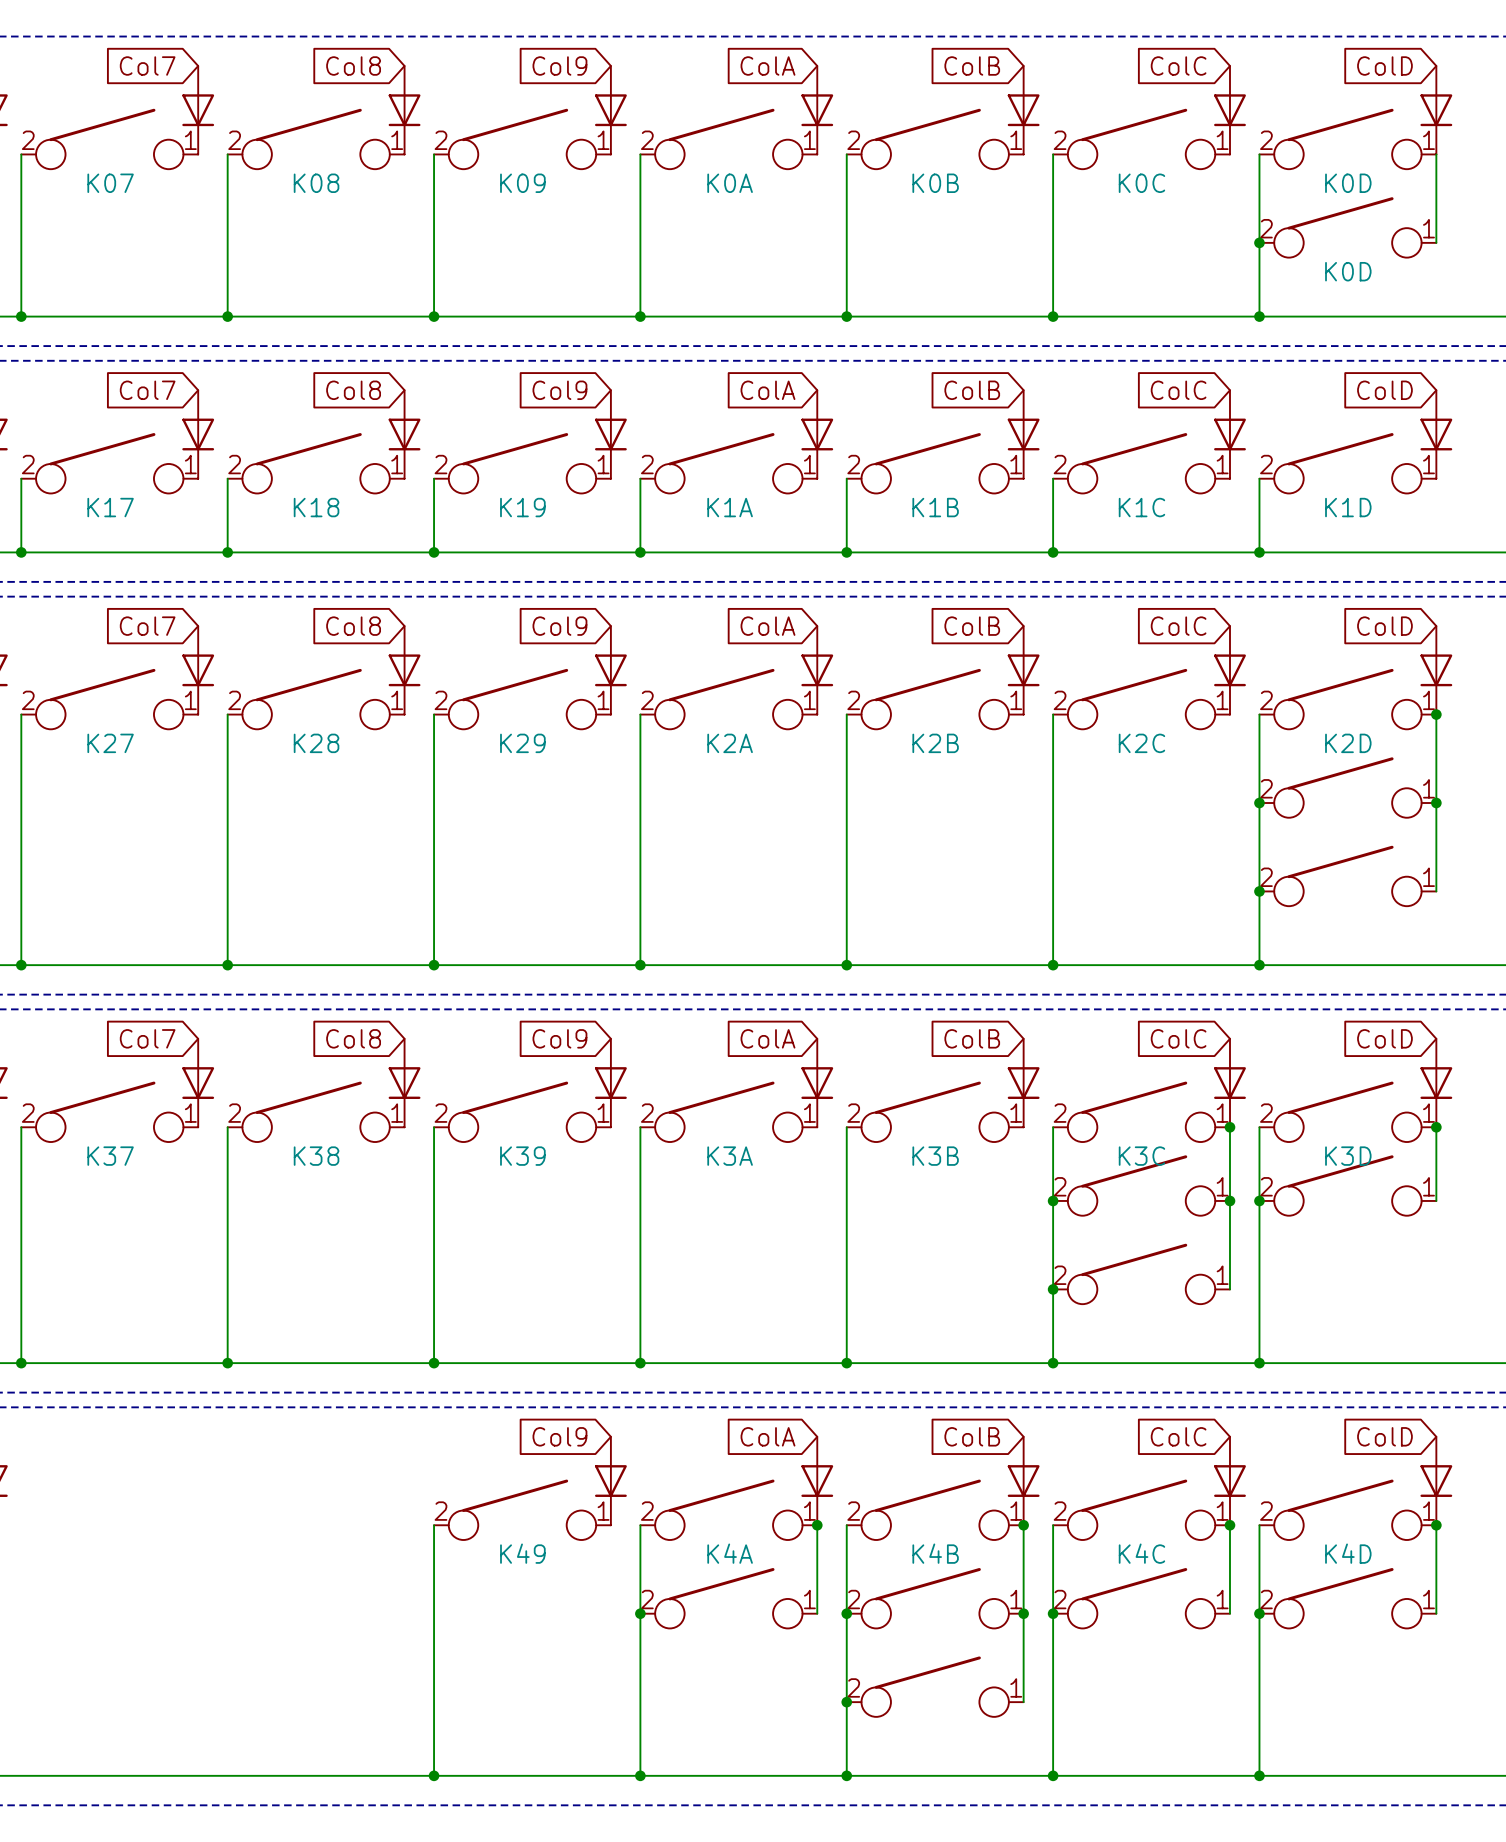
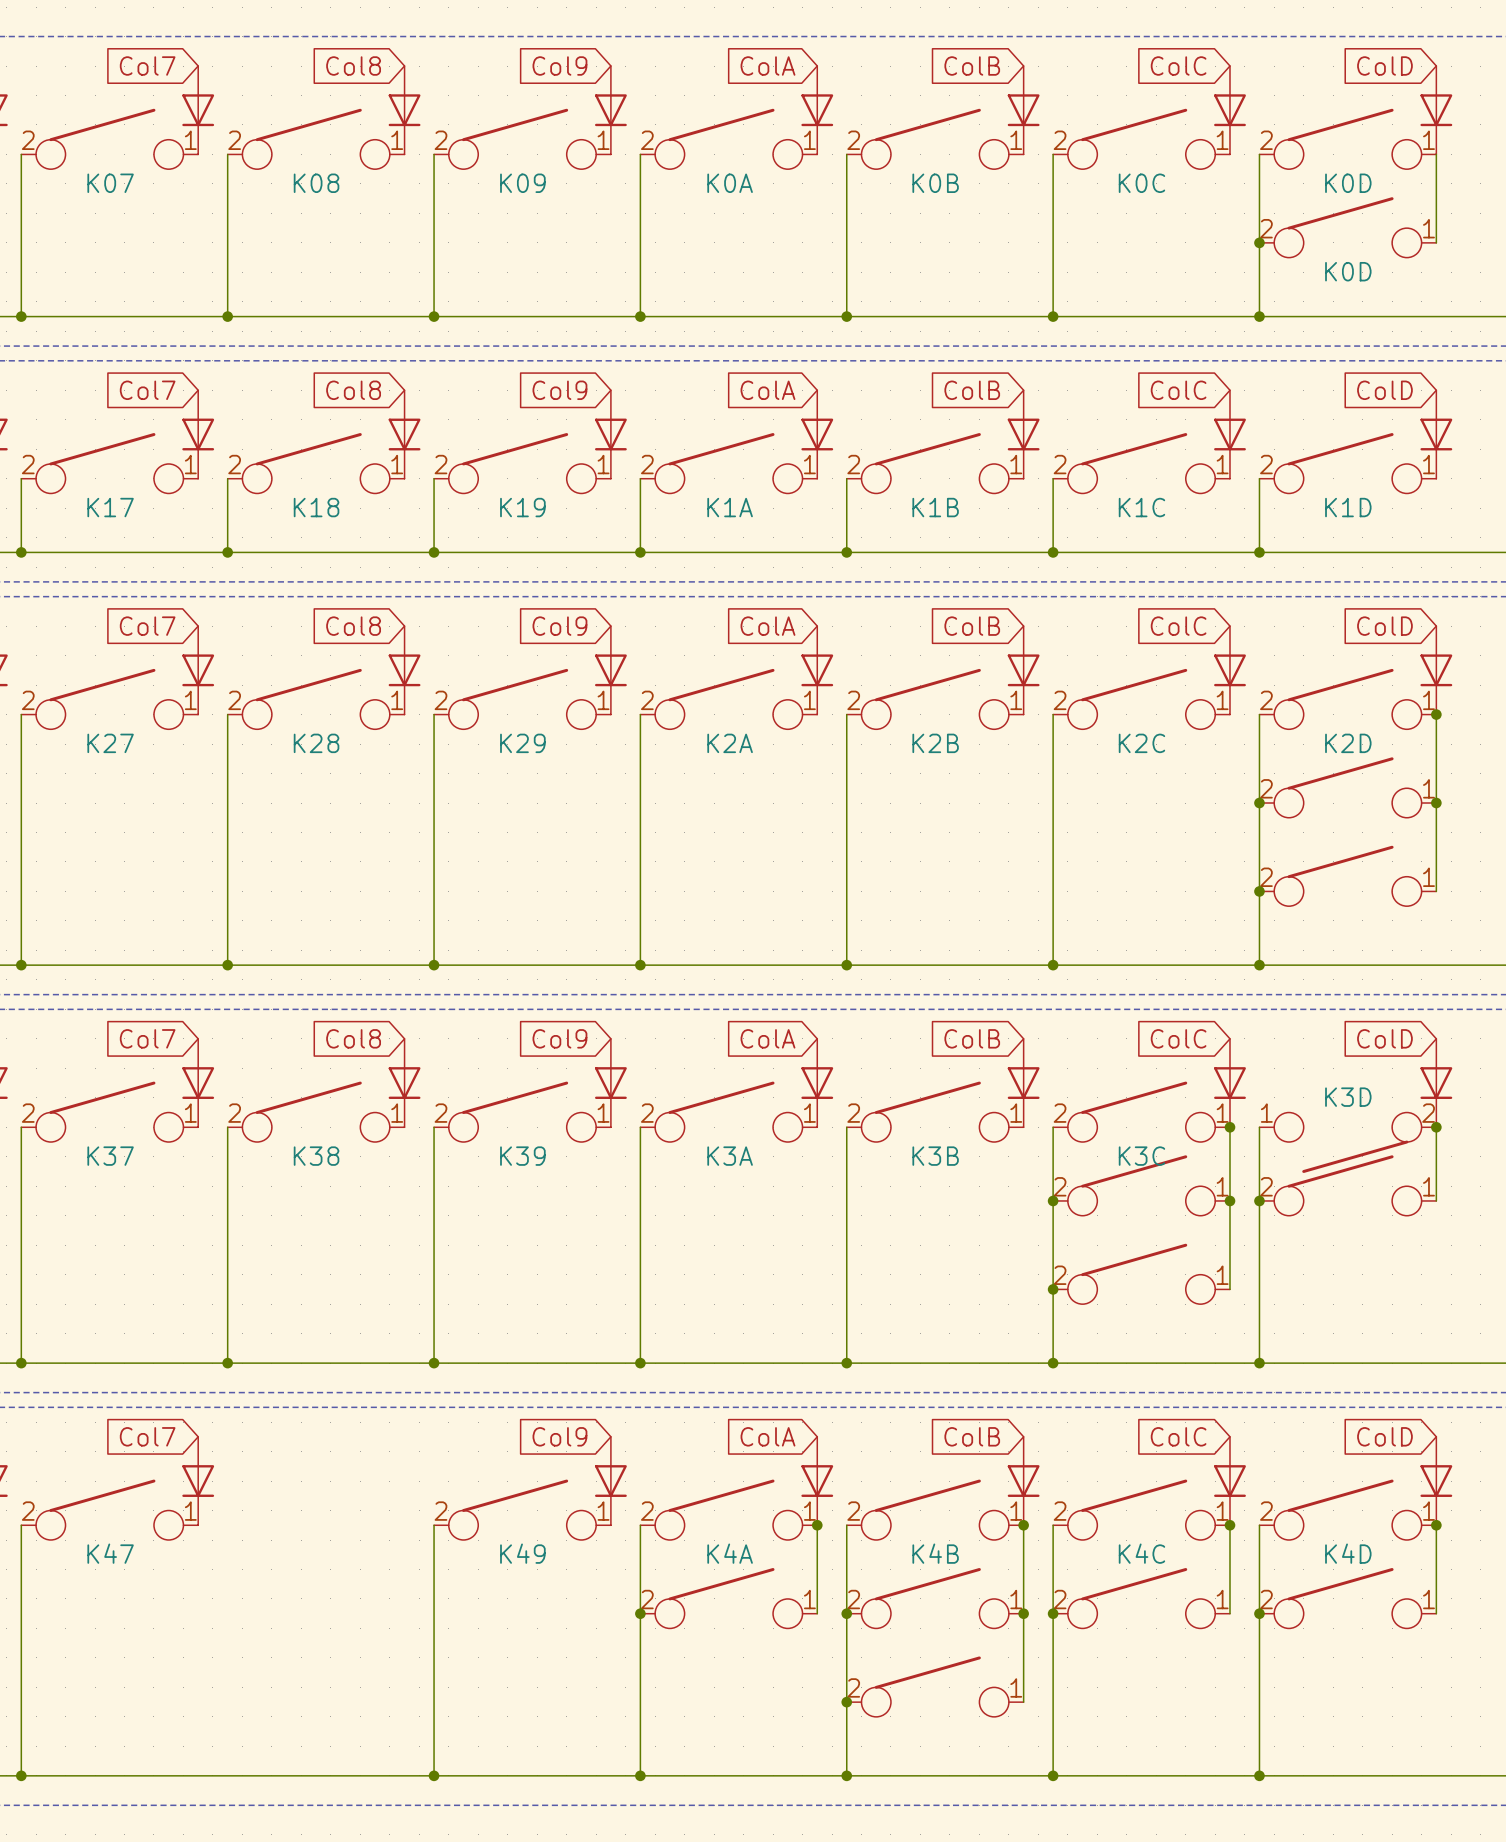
part rotation: 0° (1347, 1111) -> 180° (1347, 1142)
global label: none -> Col7 (147, 1436)
part: none -> (198, 1481)
part: none -> K47 (109, 1509)
wire: none -> (21, 1525) (21, 1775)
junction: none -> (21, 1775)

